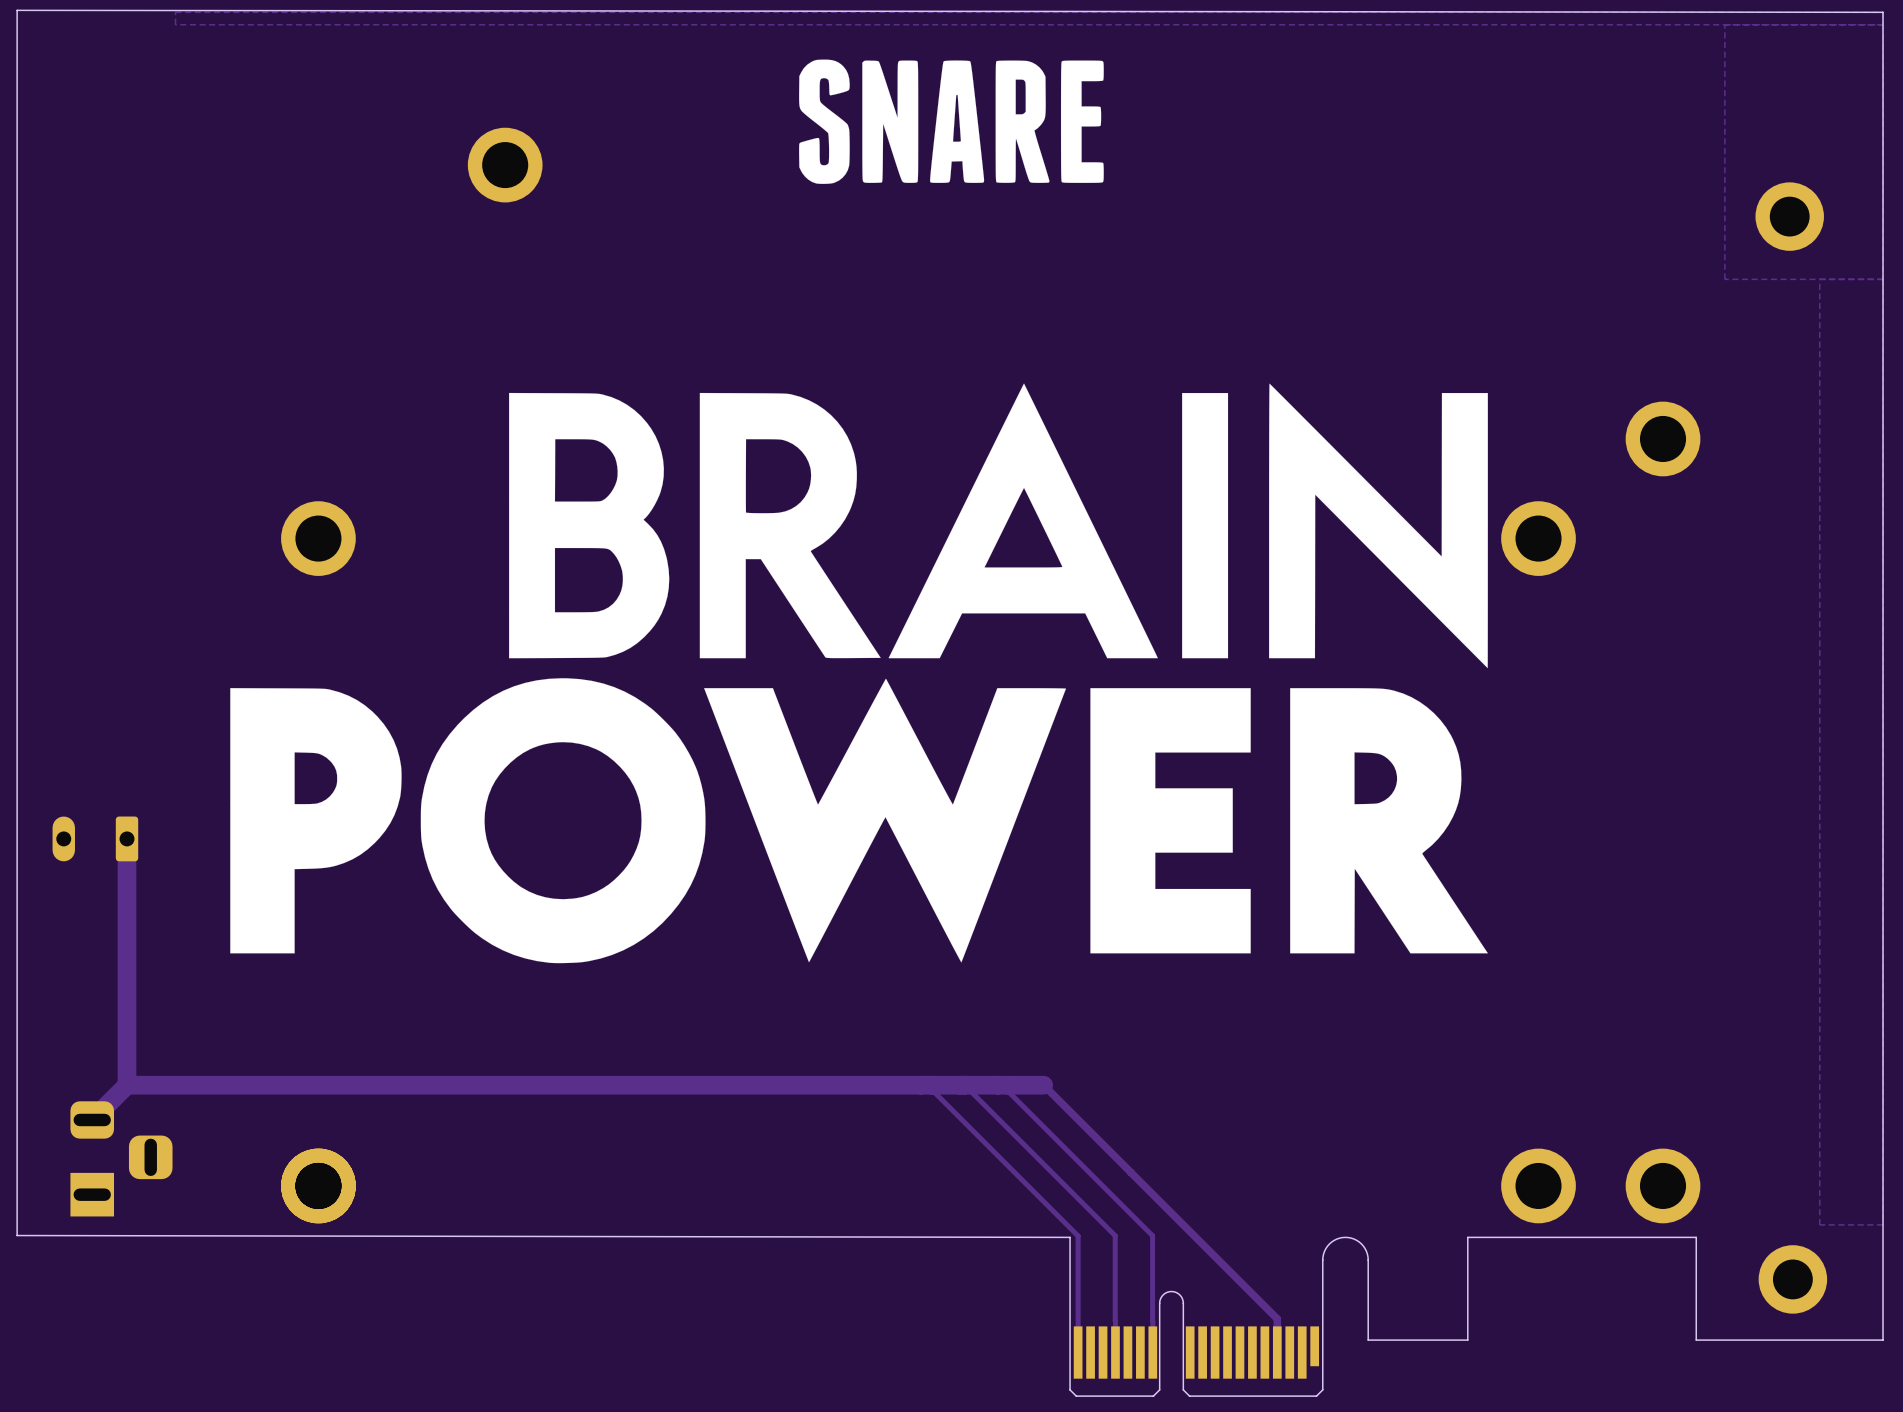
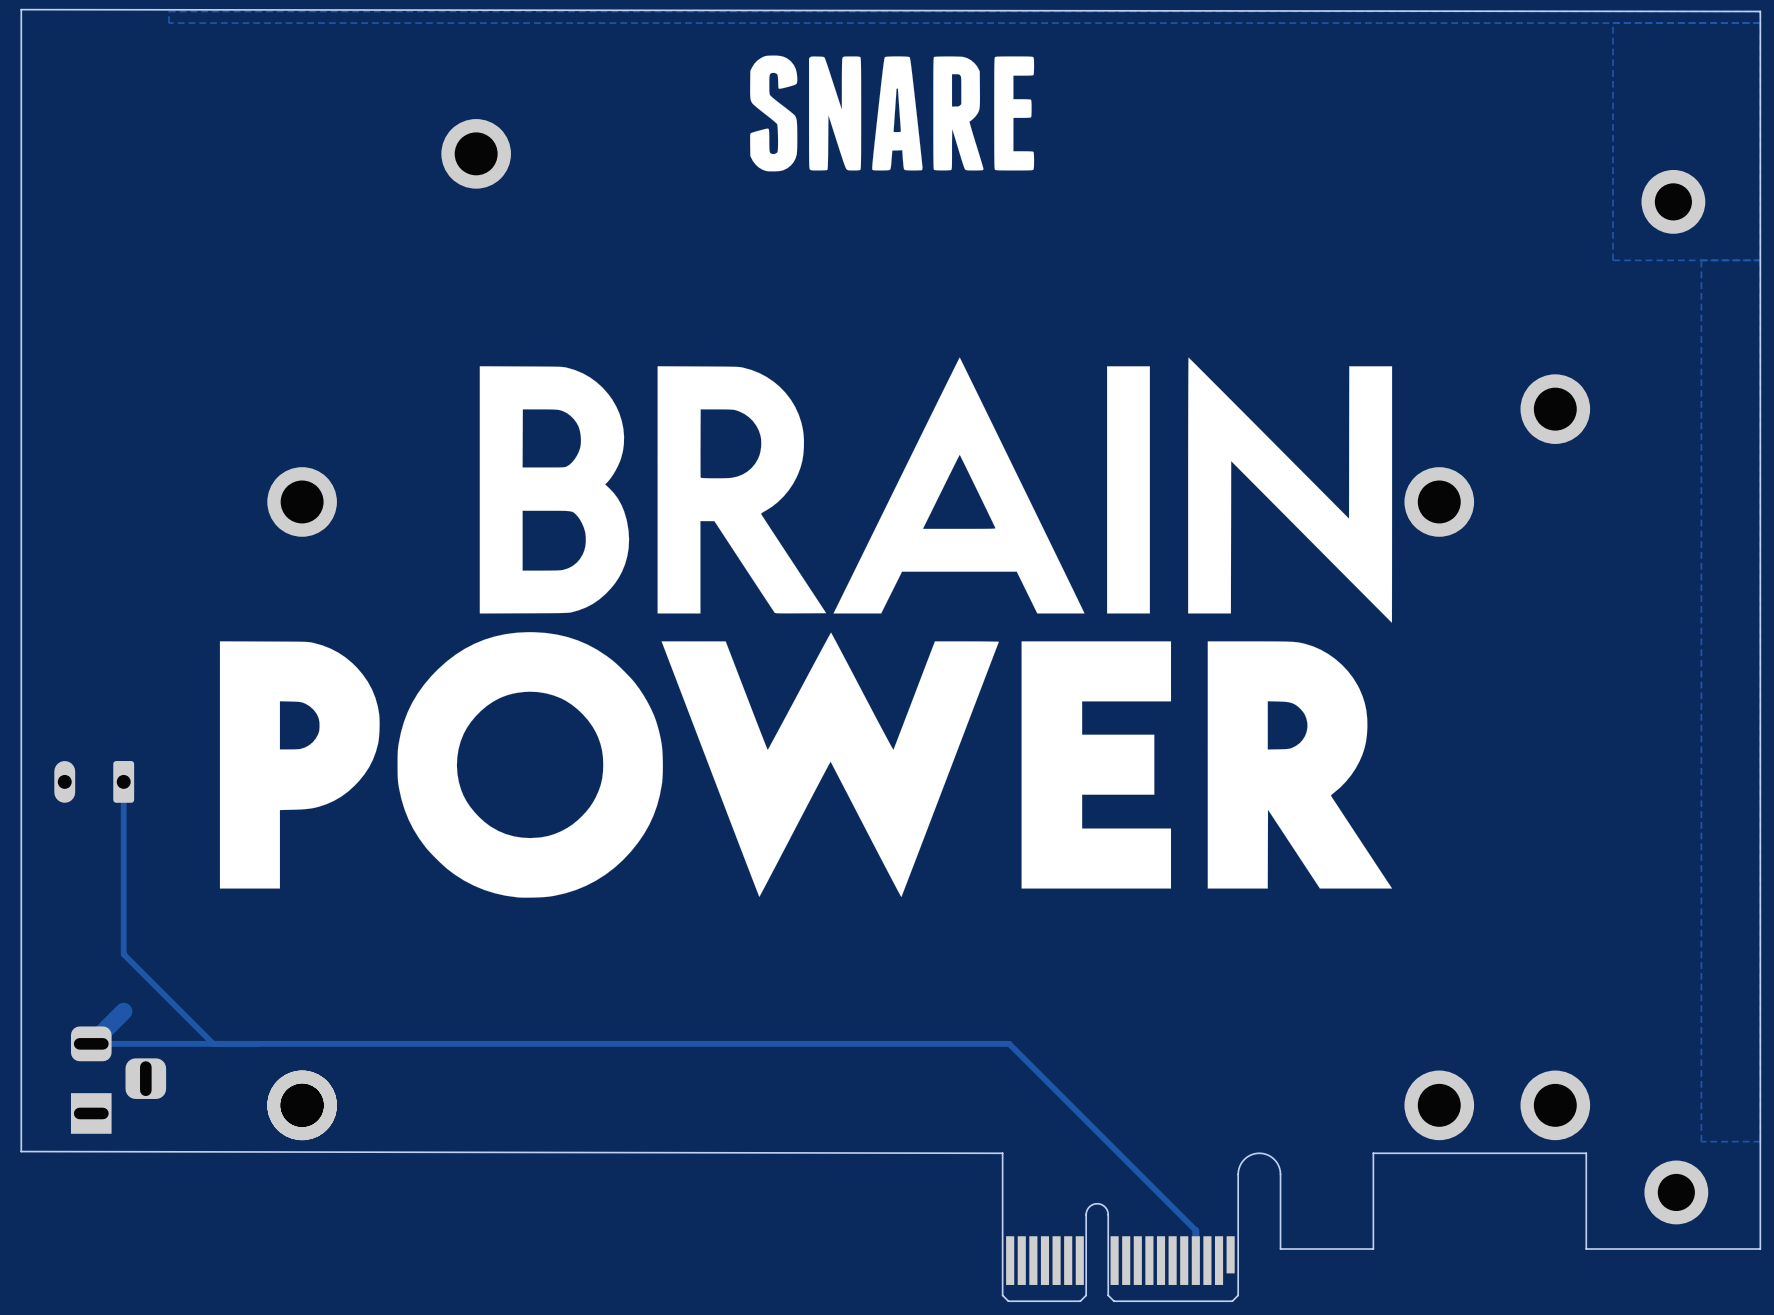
track width: thick (127, 838) (127, 1023) -> thin (123, 781) (123, 954)
track: (127, 1023) (127, 1085) (1043, 1085) (1277, 1320) -> (91, 1043) (1009, 1043) (1195, 1230)
track: none -> (123, 954) (213, 1043)
track: (921, 1085) (927, 1085) (1078, 1236) (1078, 1352) -> none
track: (964, 1085) (1115, 1235) (1115, 1352) -> none
track: (1008, 1085) (1008, 1091) (1152, 1235) (1152, 1352) -> none

